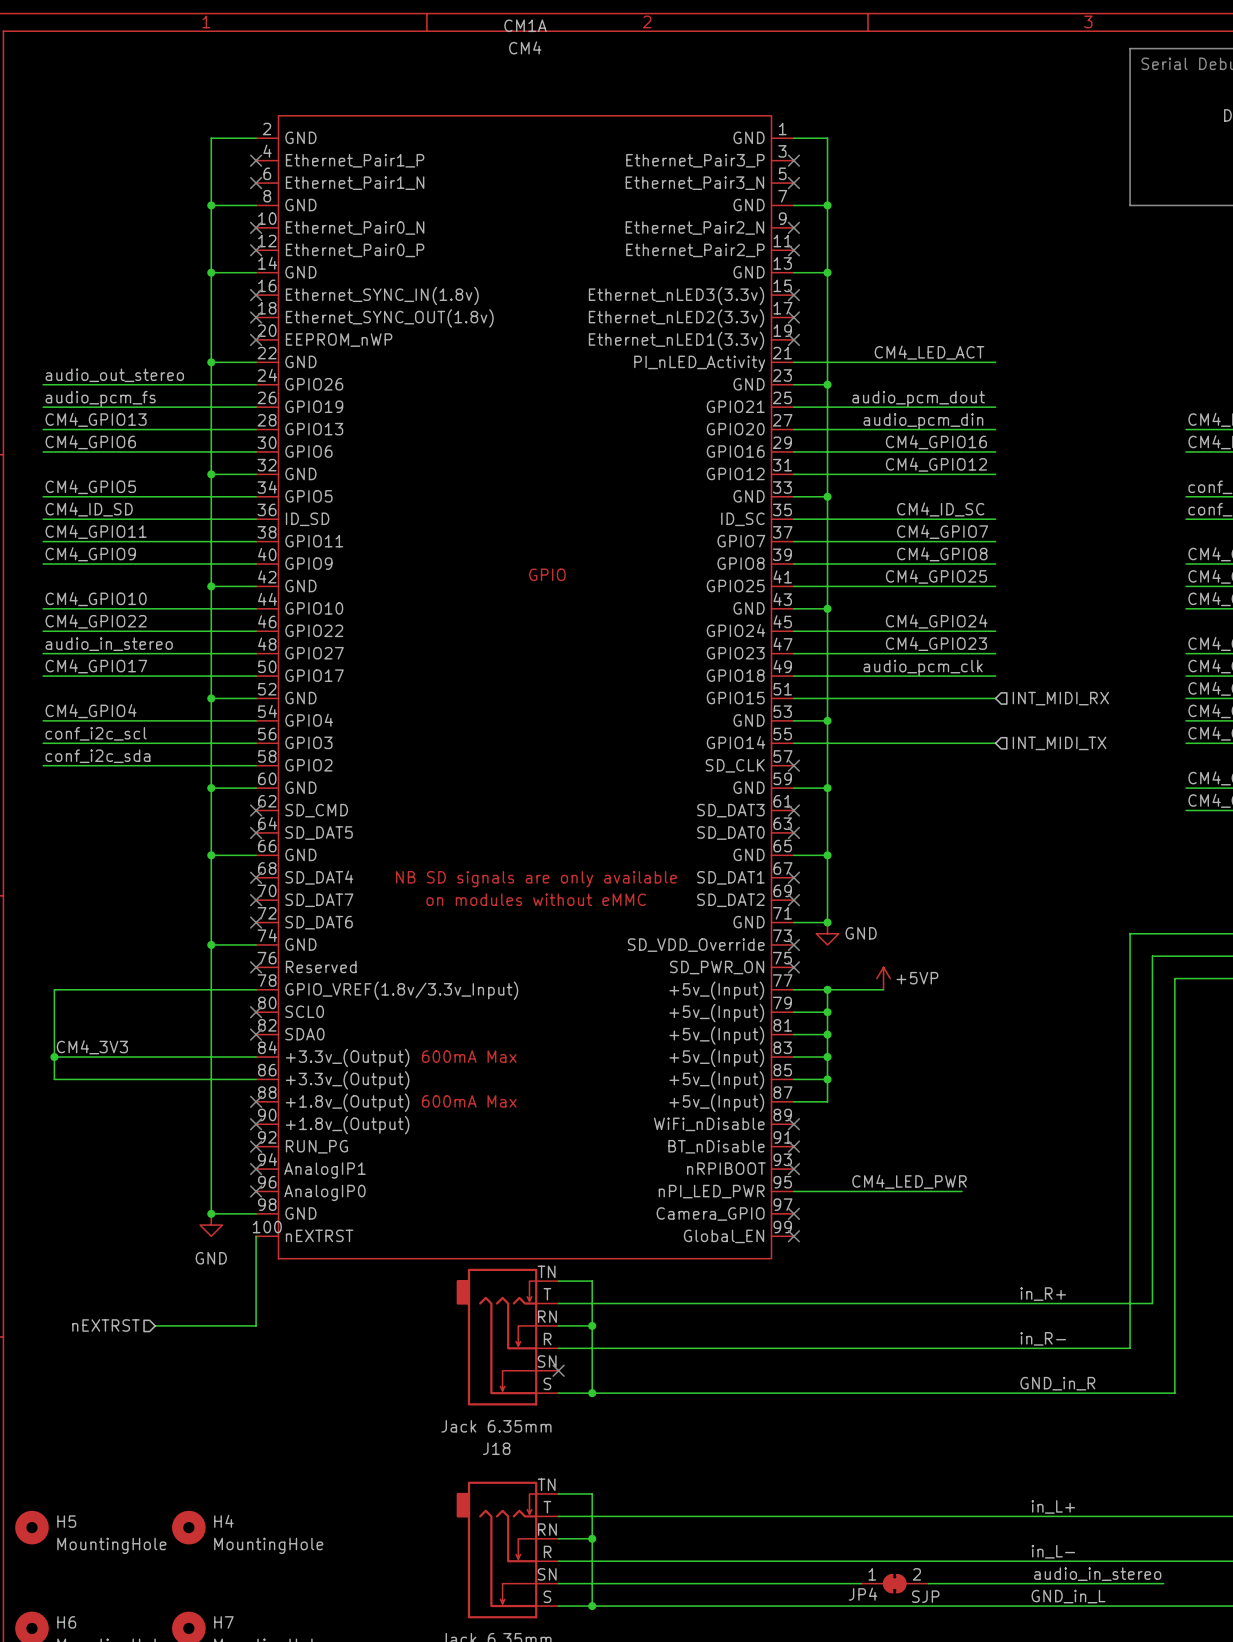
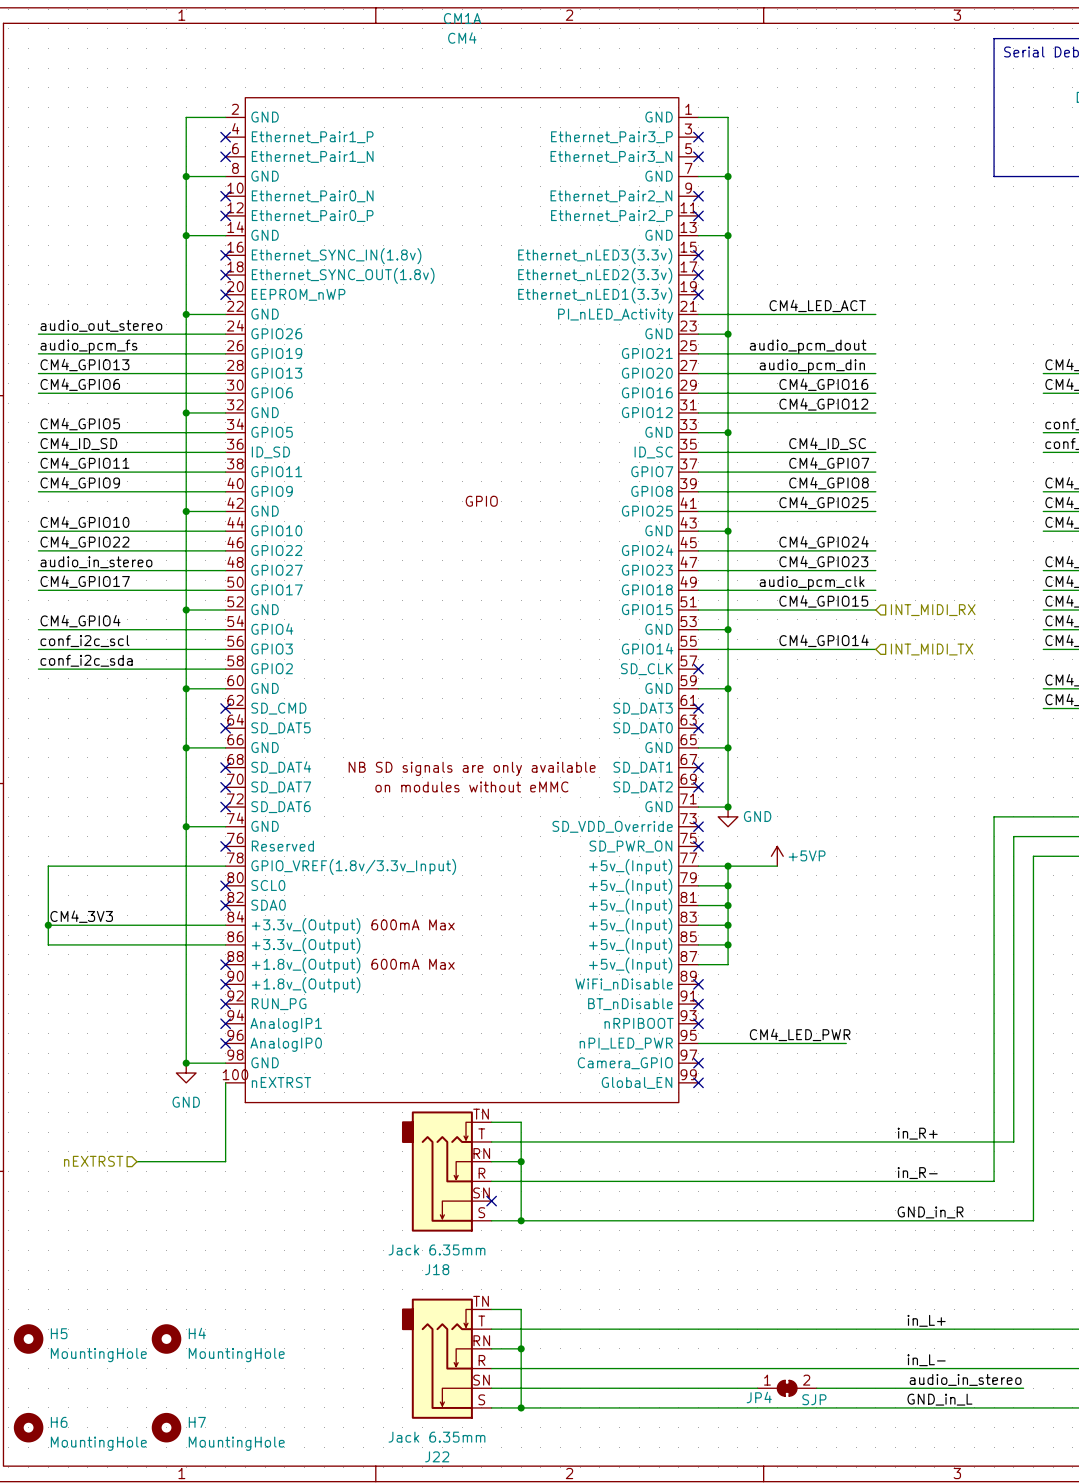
label: none -> CM4_GPIO15 (823, 601)
label: none -> CM4_GPIO14 (824, 640)

